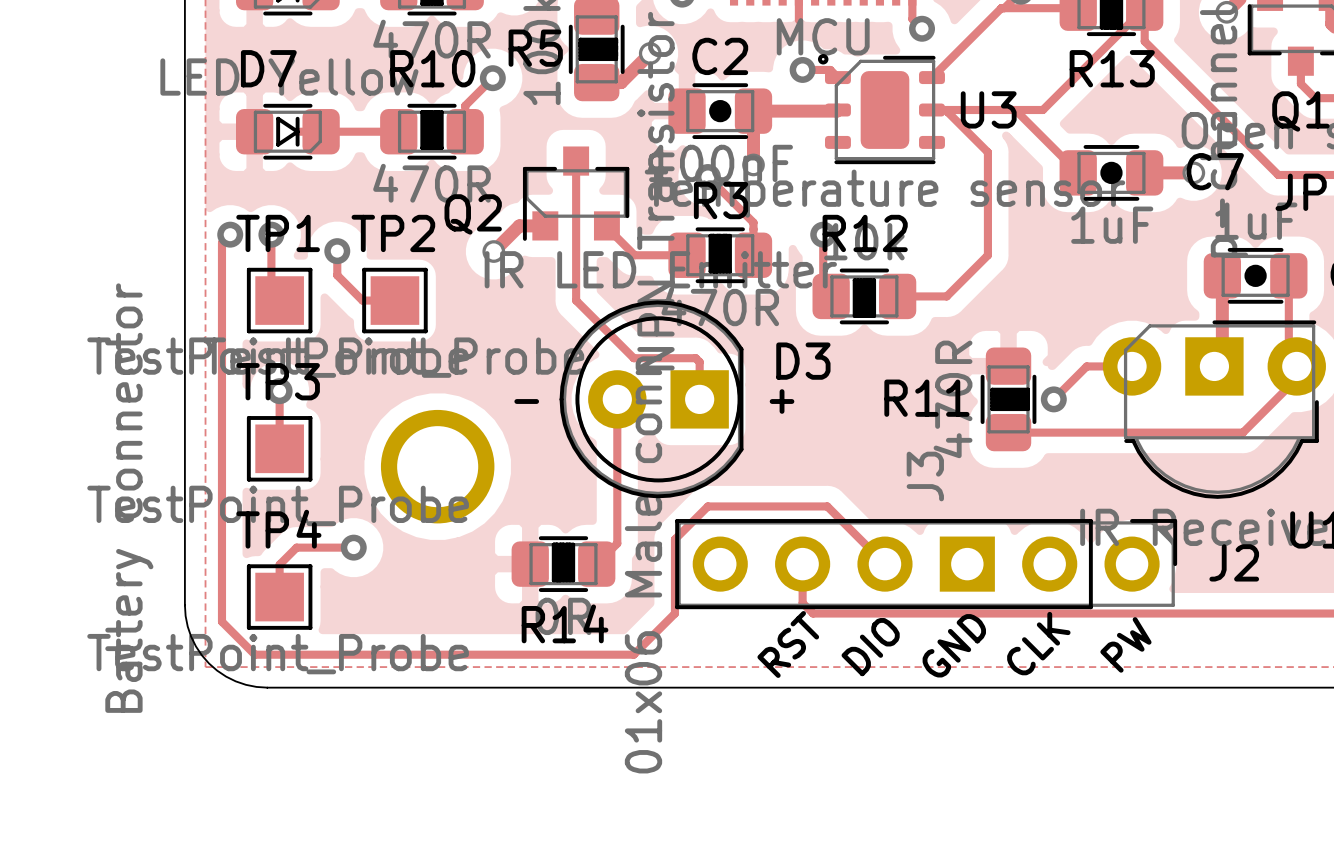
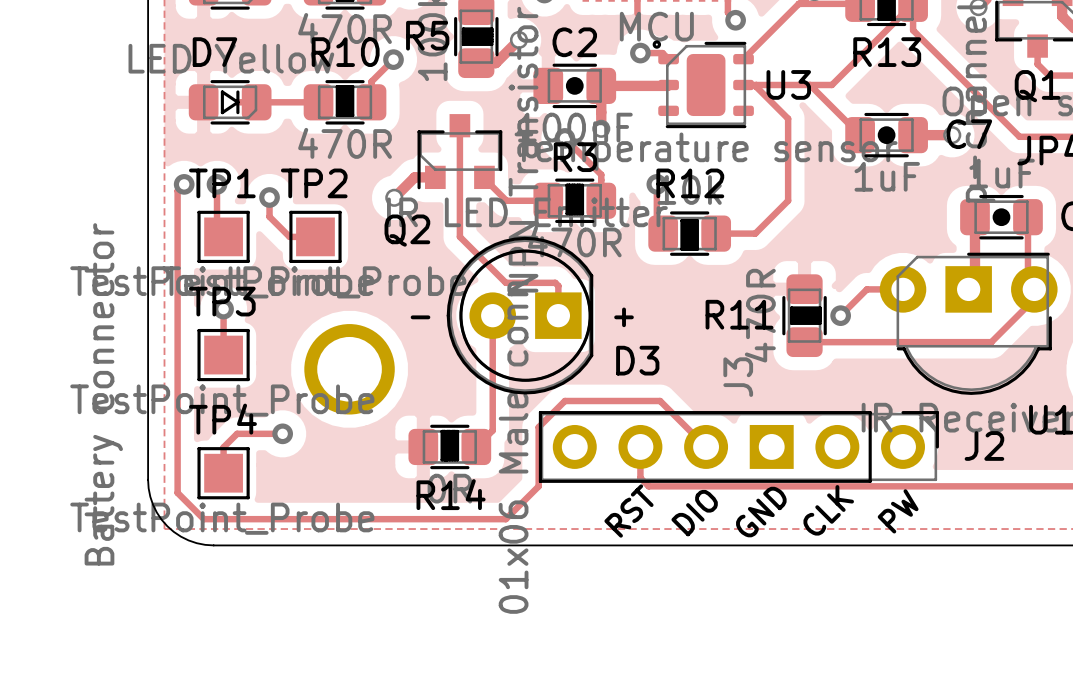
Q2 name position: Q2 (473, 214) -> Q2 (407, 230)
D3 name position: D3 (803, 361) -> D3 (637, 360)

